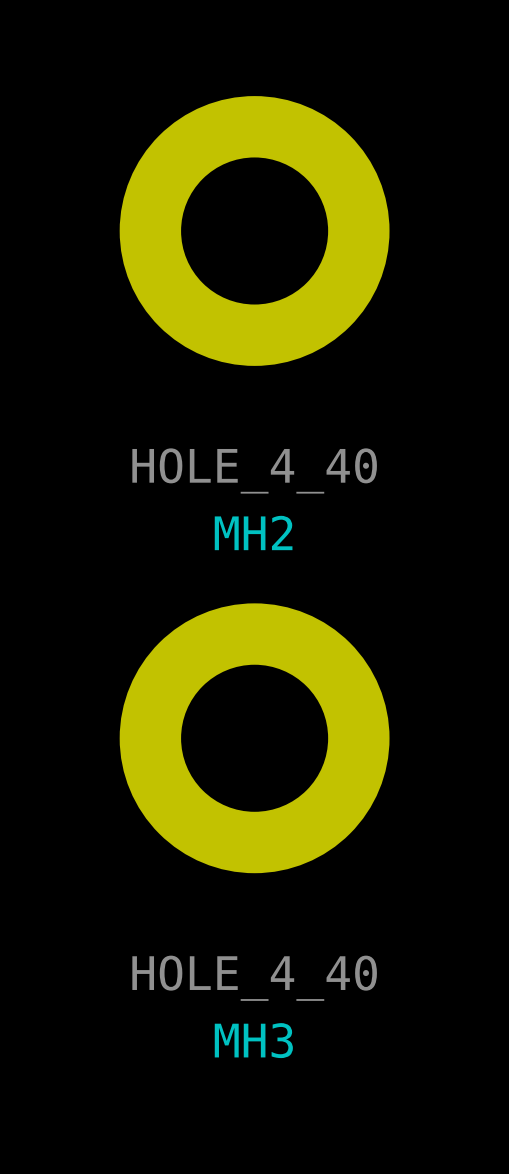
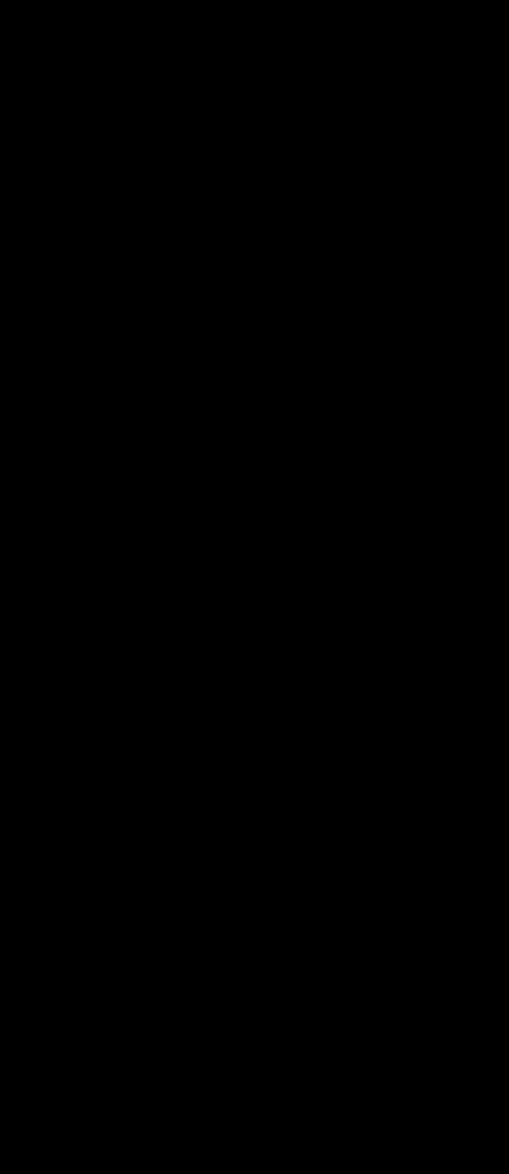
MH2: HOLE_4_40 (254, 230) -> none
MH3: HOLE_4_40 (254, 738) -> none

